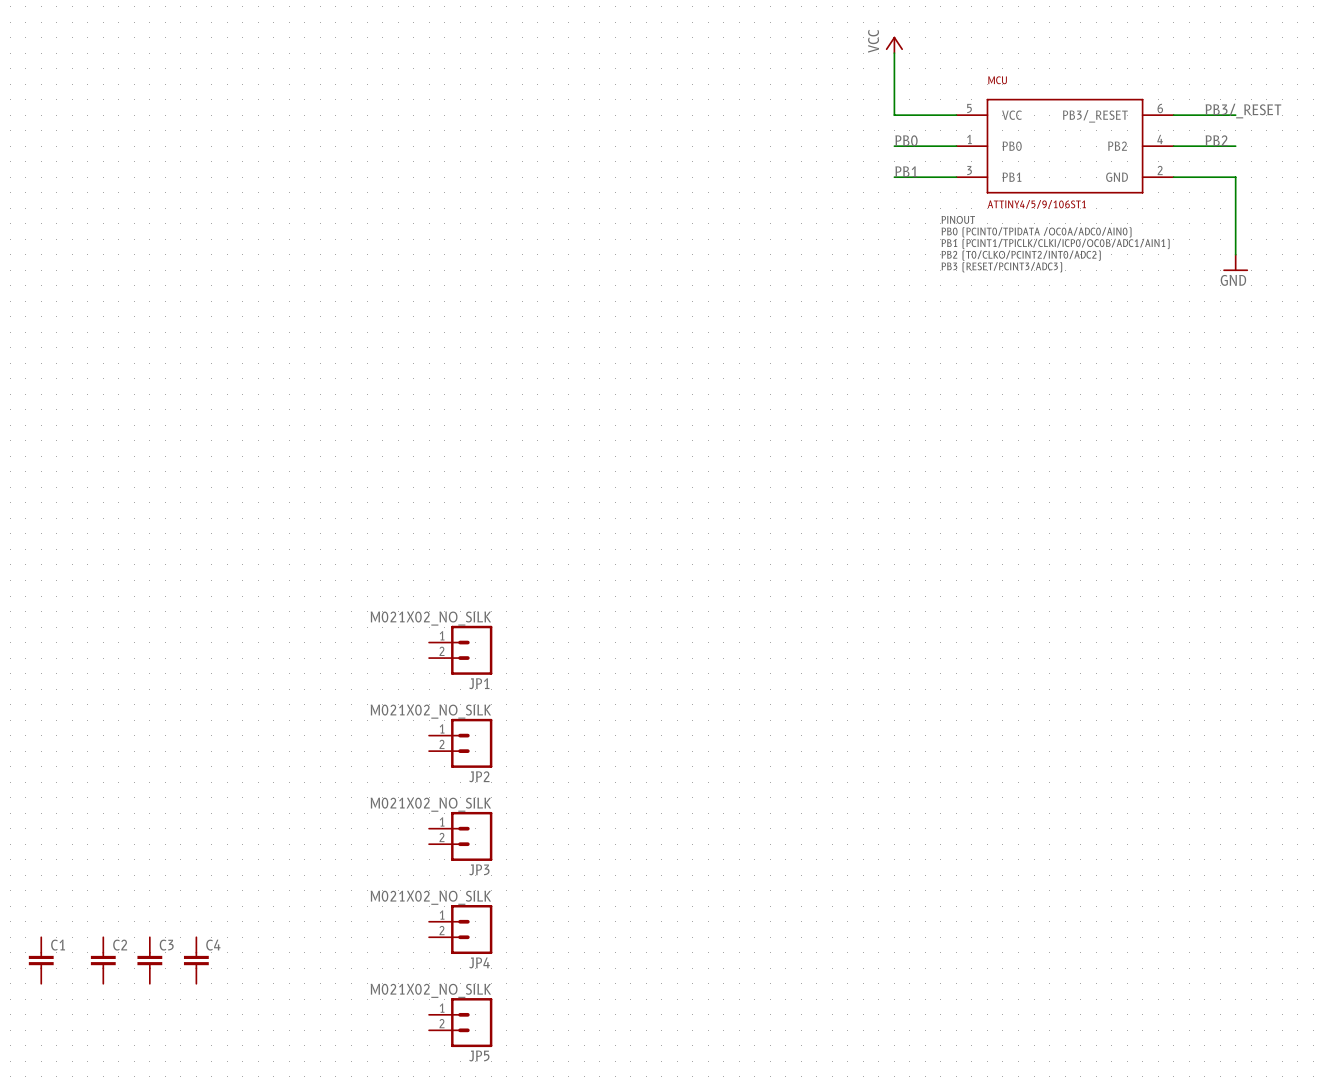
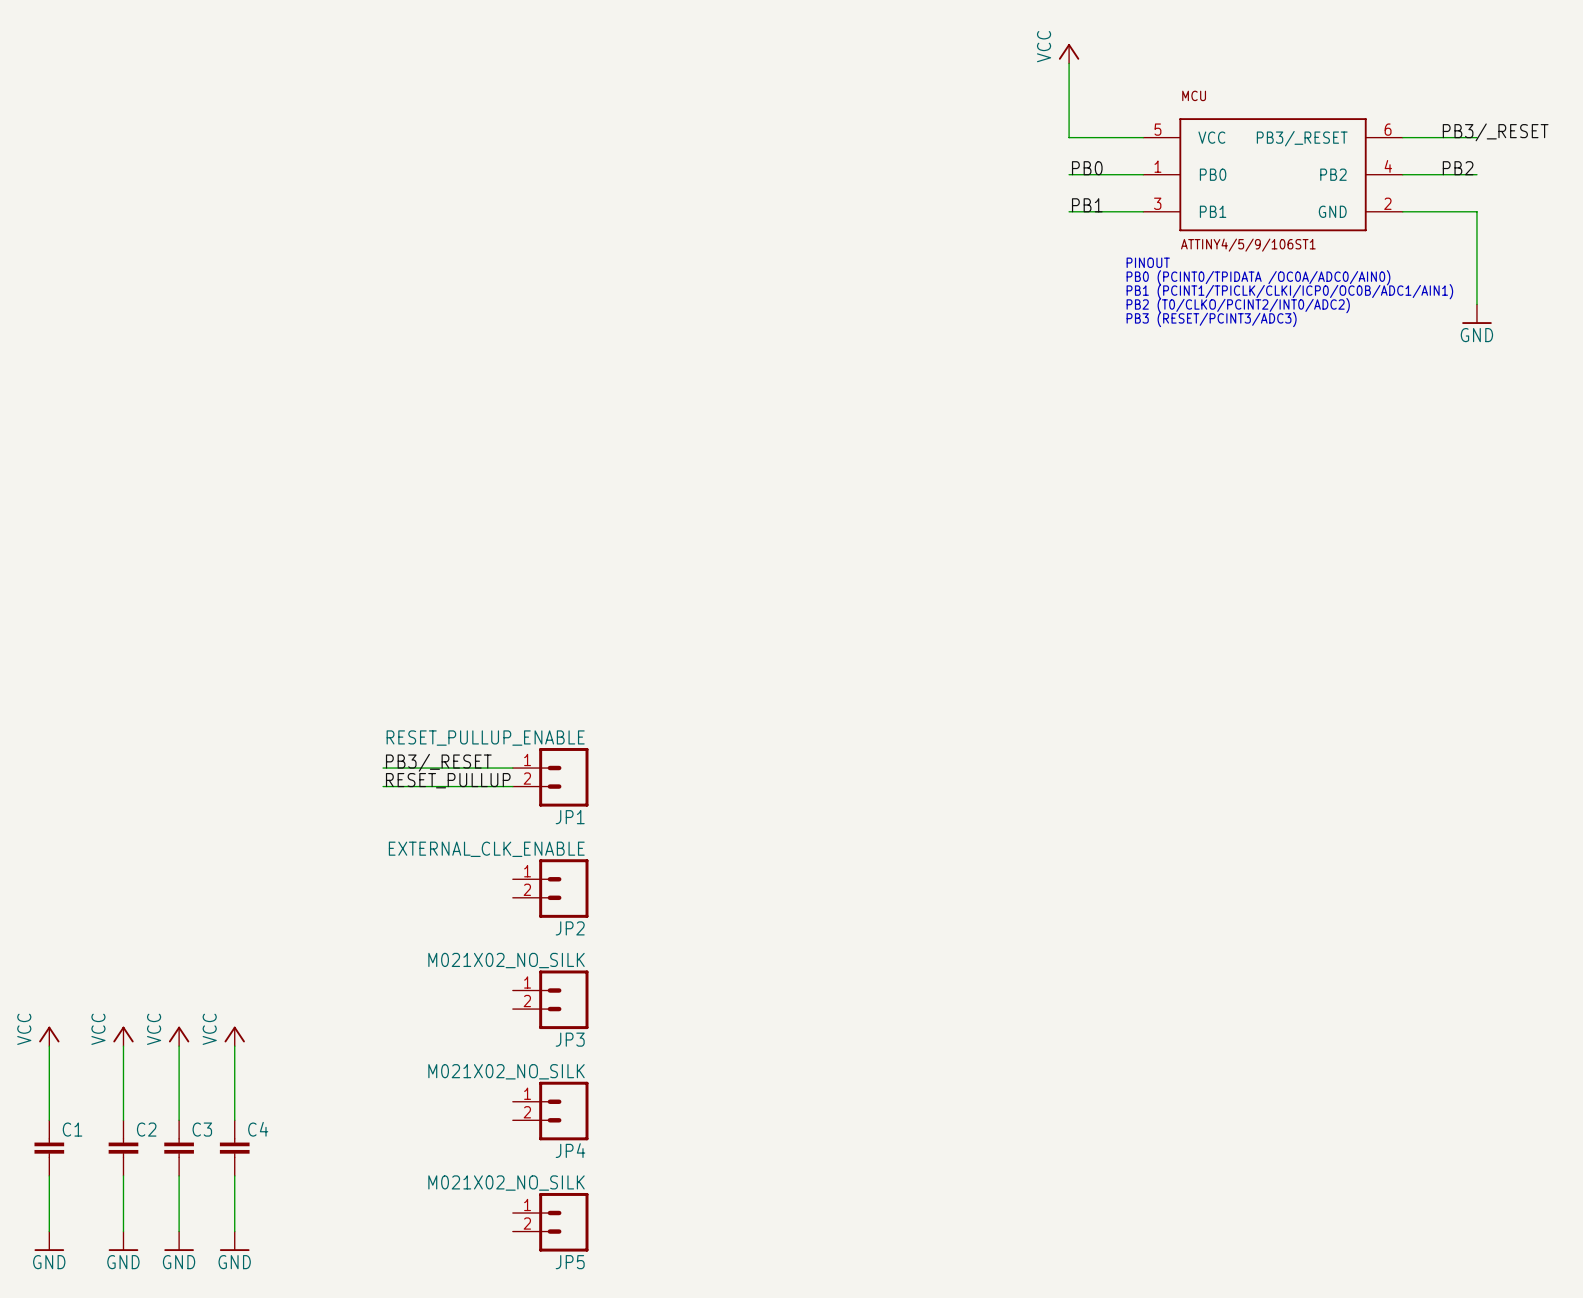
JP1 value: M021X02_NO_SILK (430, 618) -> RESET_PULLUP_ENABLE (485, 738)
label: none -> PB3/_RESET (438, 762)
wire: none -> (383, 768) (512, 768)
label: none -> RESET_PULLUP (448, 780)
wire: none -> (383, 786) (512, 786)
JP2 value: M021X02_NO_SILK (430, 711) -> EXTERNAL_CLK_ENABLE (486, 849)
power symbol: none -> VCC (49, 1036)
power symbol: none -> VCC (123, 1036)
power symbol: none -> VCC (179, 1036)
power symbol: none -> VCC (234, 1036)
wire: none -> (49, 1046) (49, 1120)
wire: none -> (123, 1046) (123, 1120)
wire: none -> (179, 1046) (179, 1120)
wire: none -> (234, 1046) (234, 1120)
wire: none -> (49, 1175) (49, 1231)
wire: none -> (123, 1175) (123, 1231)
wire: none -> (179, 1175) (179, 1231)
wire: none -> (234, 1175) (234, 1231)
power symbol: none -> GND (49, 1241)
power symbol: none -> GND (123, 1241)
power symbol: none -> GND (179, 1241)
power symbol: none -> GND (234, 1241)

